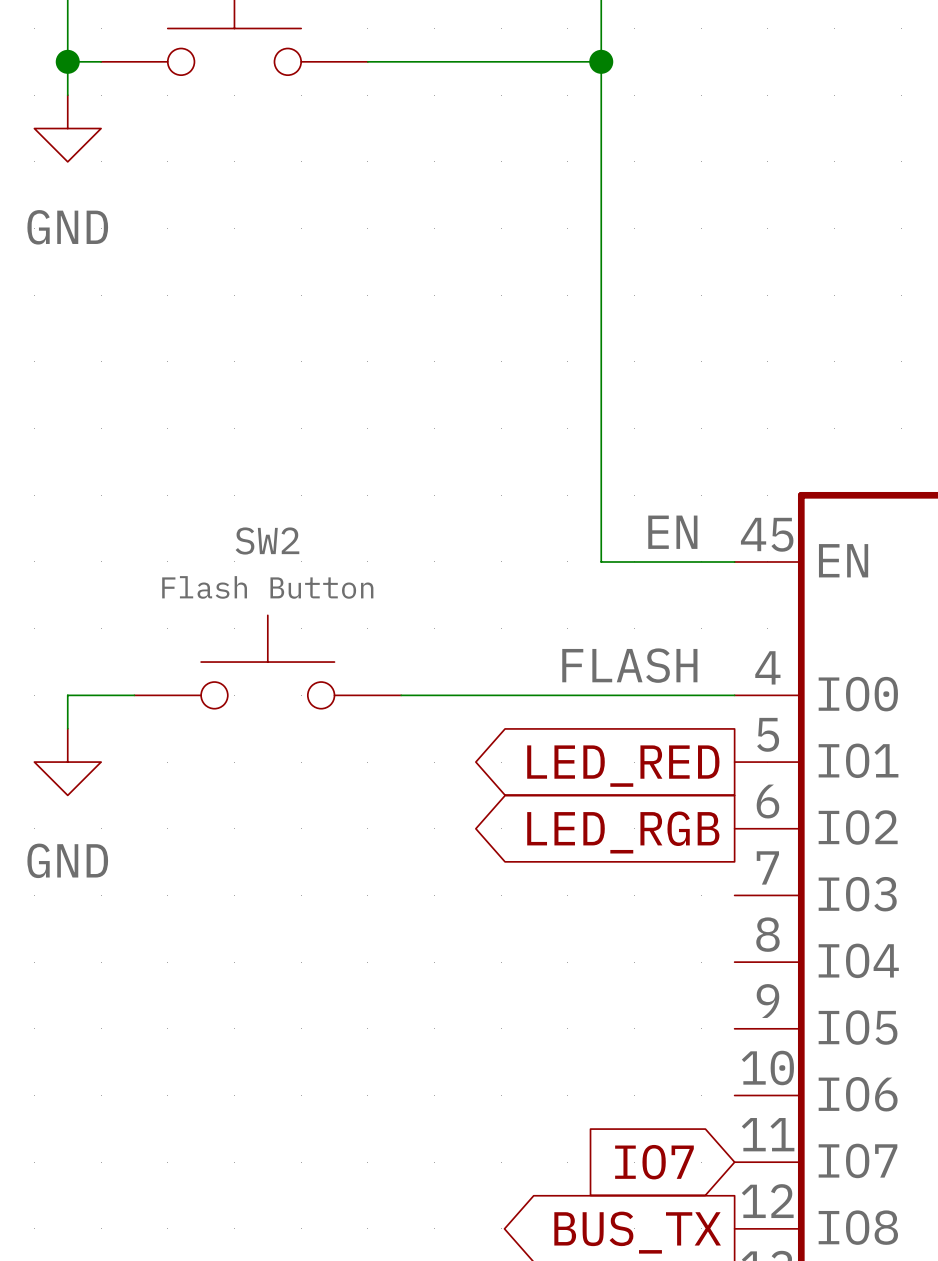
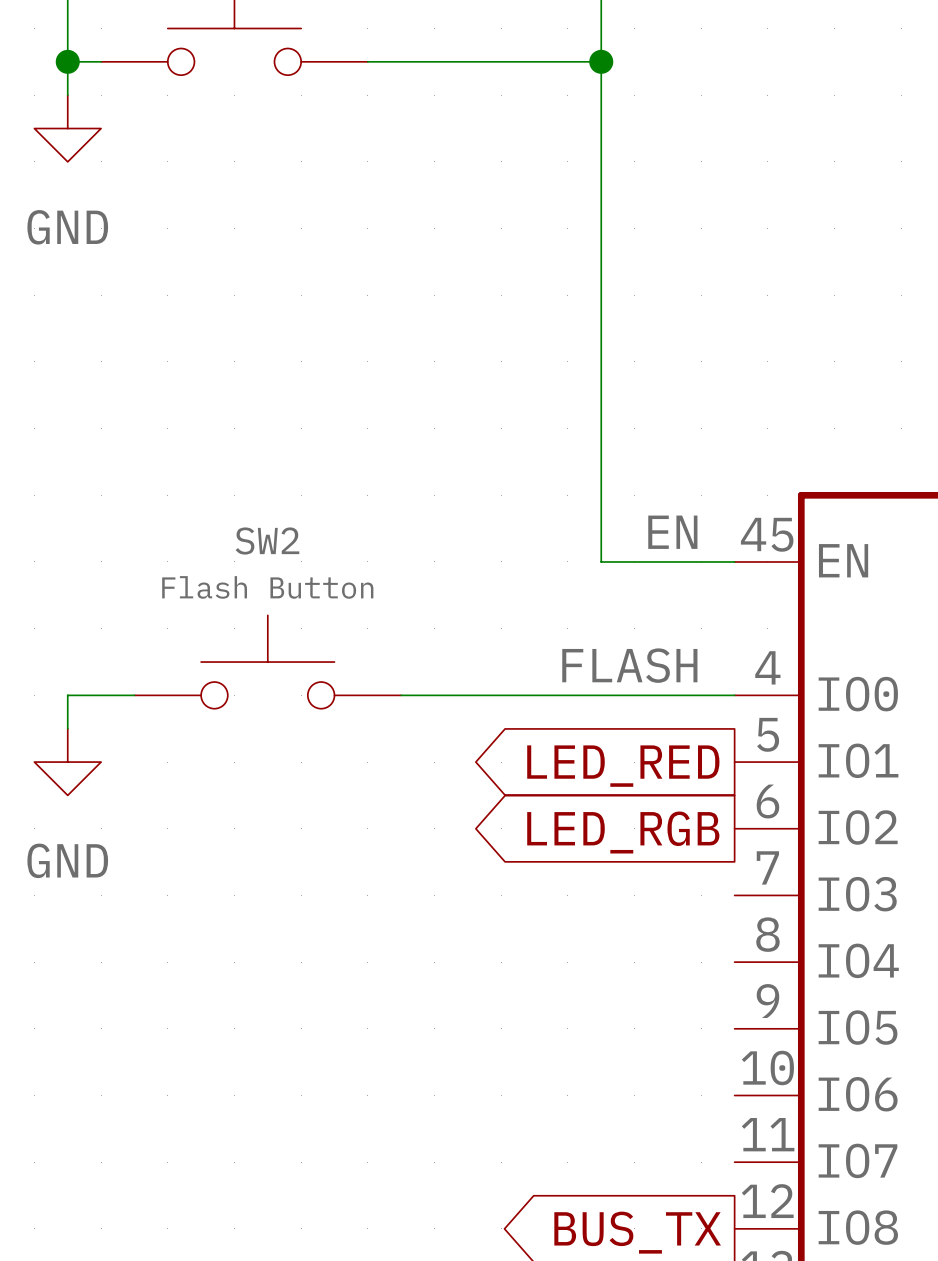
global label: IO7 (654, 1162) -> none

